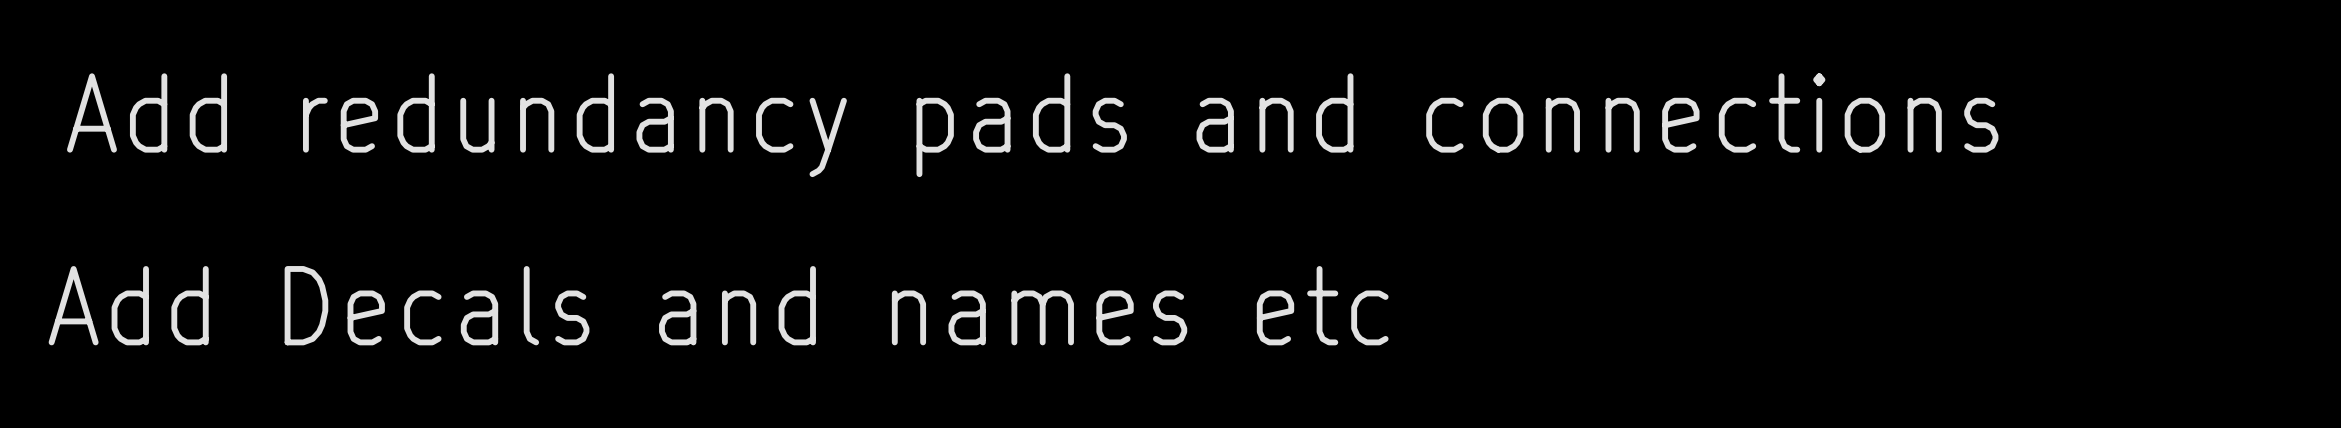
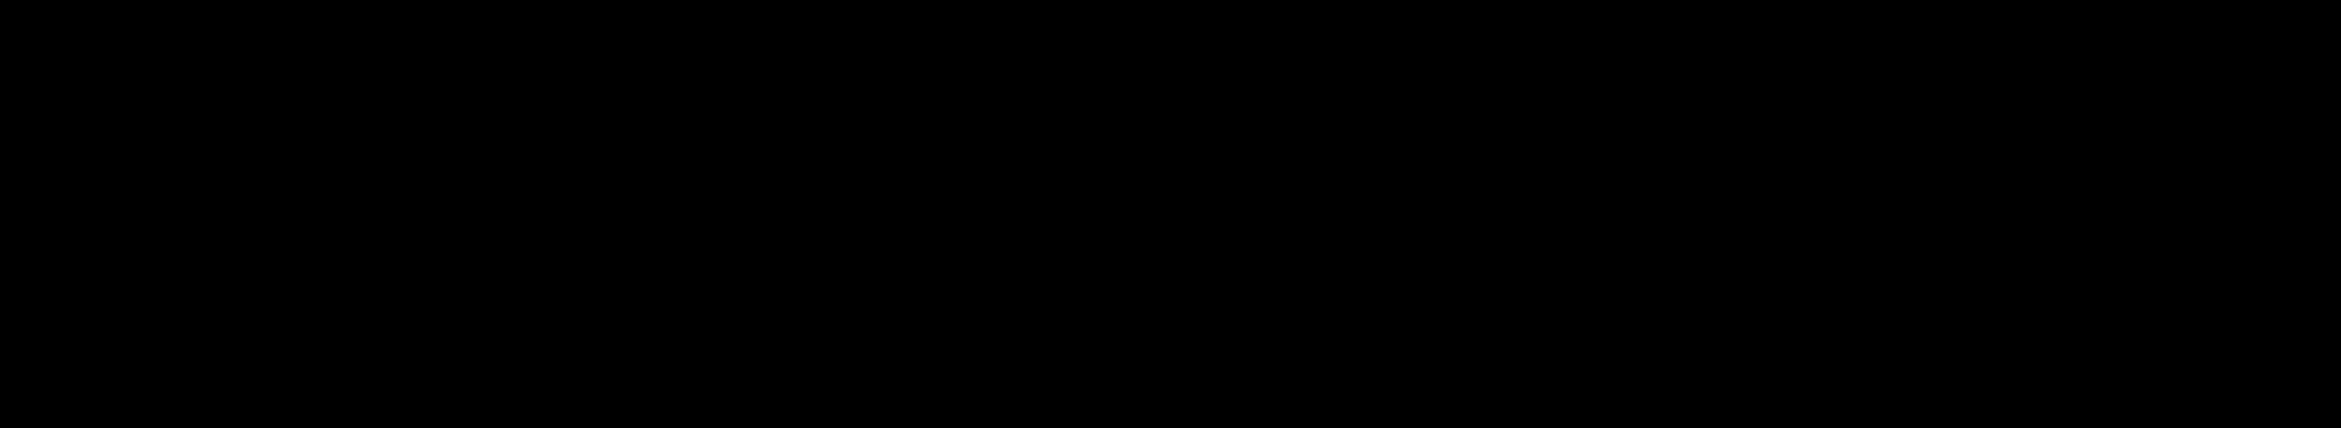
text: Add redundancy pads and connections (1032, 125) -> none
text: Add Decals and names etc (718, 305) -> none

